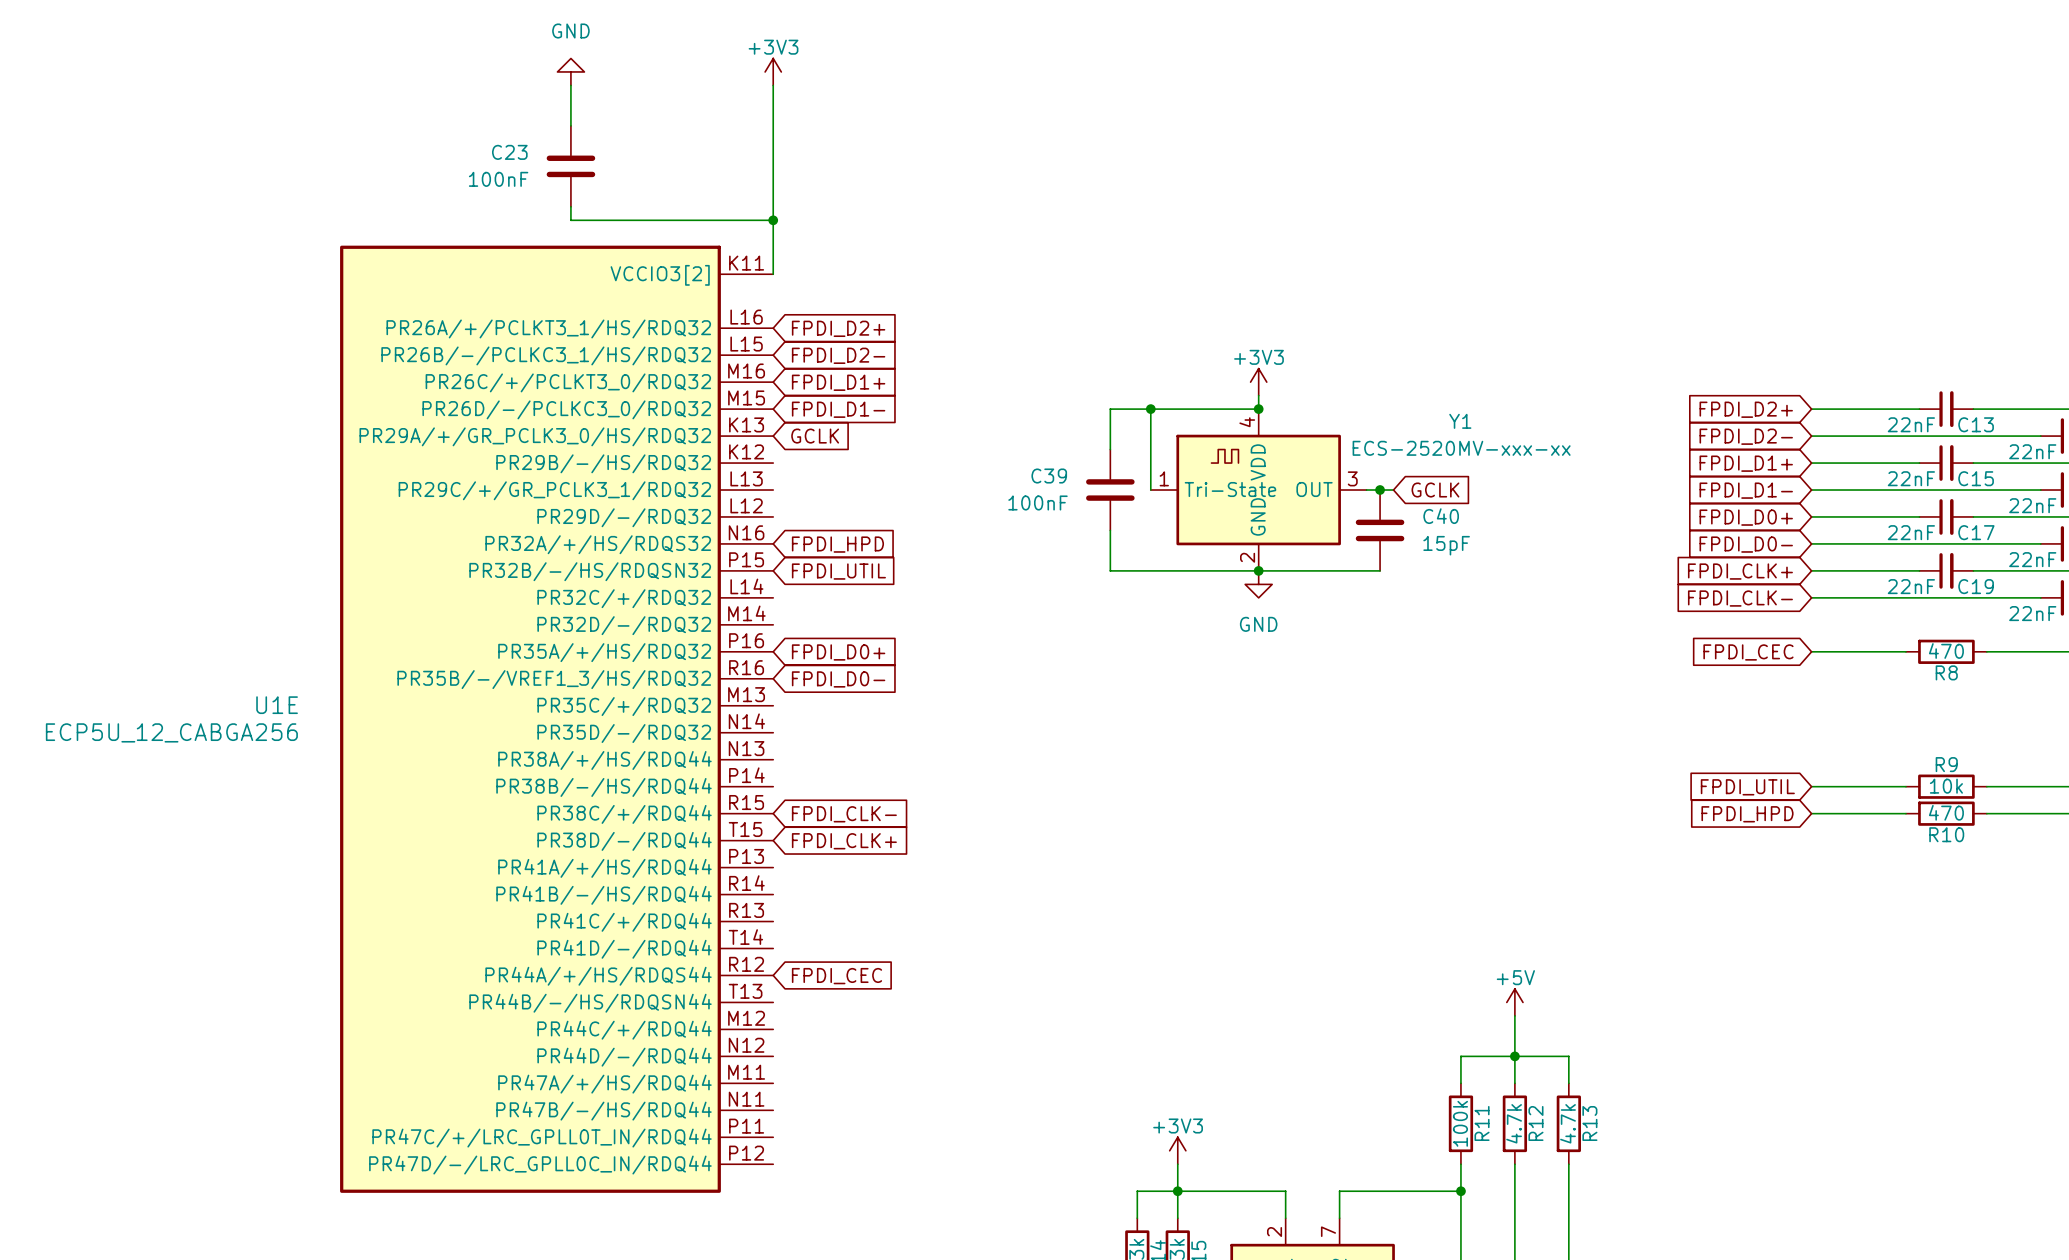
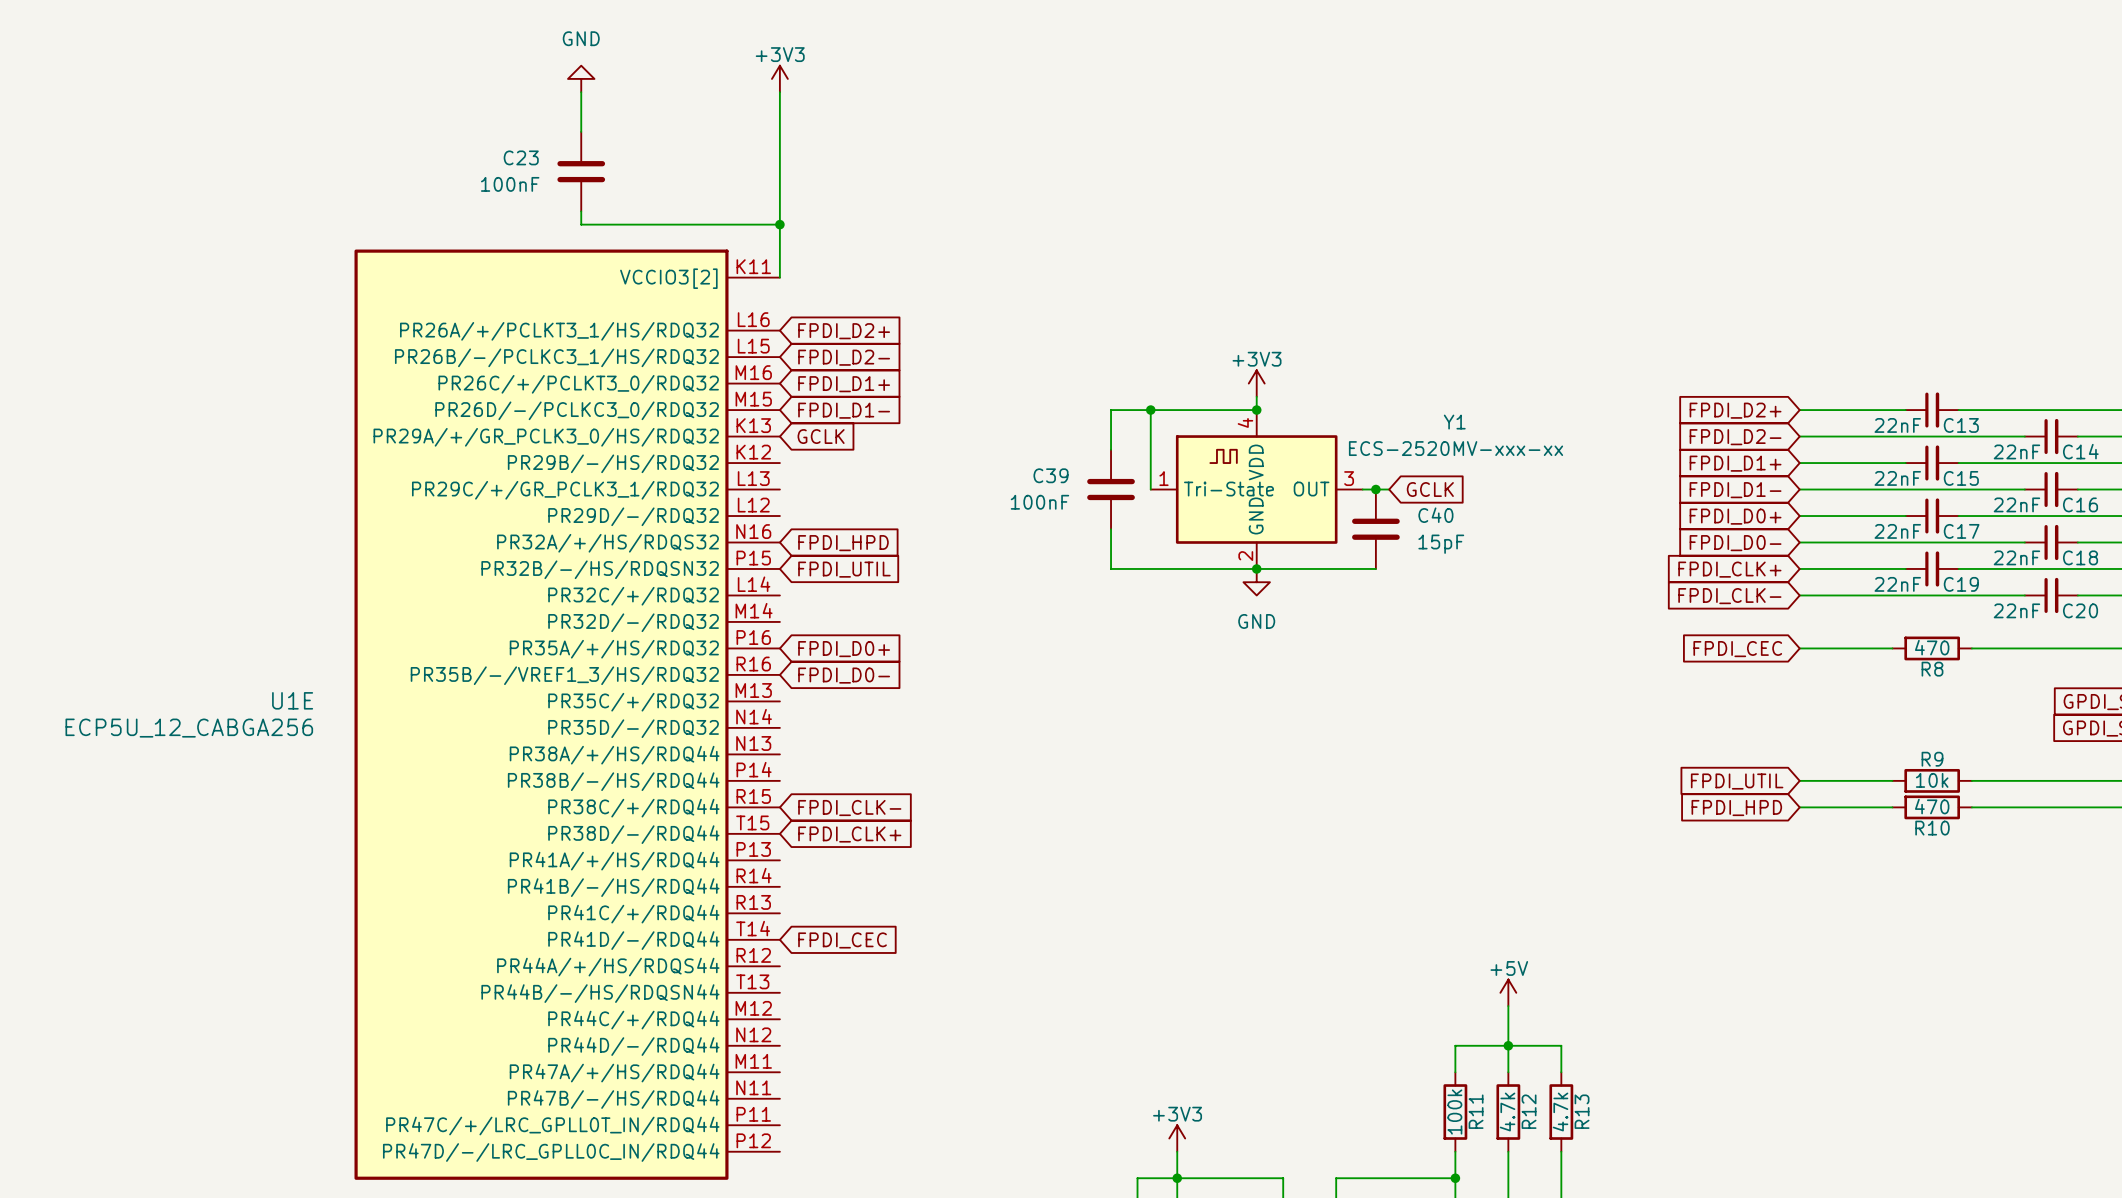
global label position: FPDI_CEC (836, 976) -> FPDI_CEC (842, 940)

